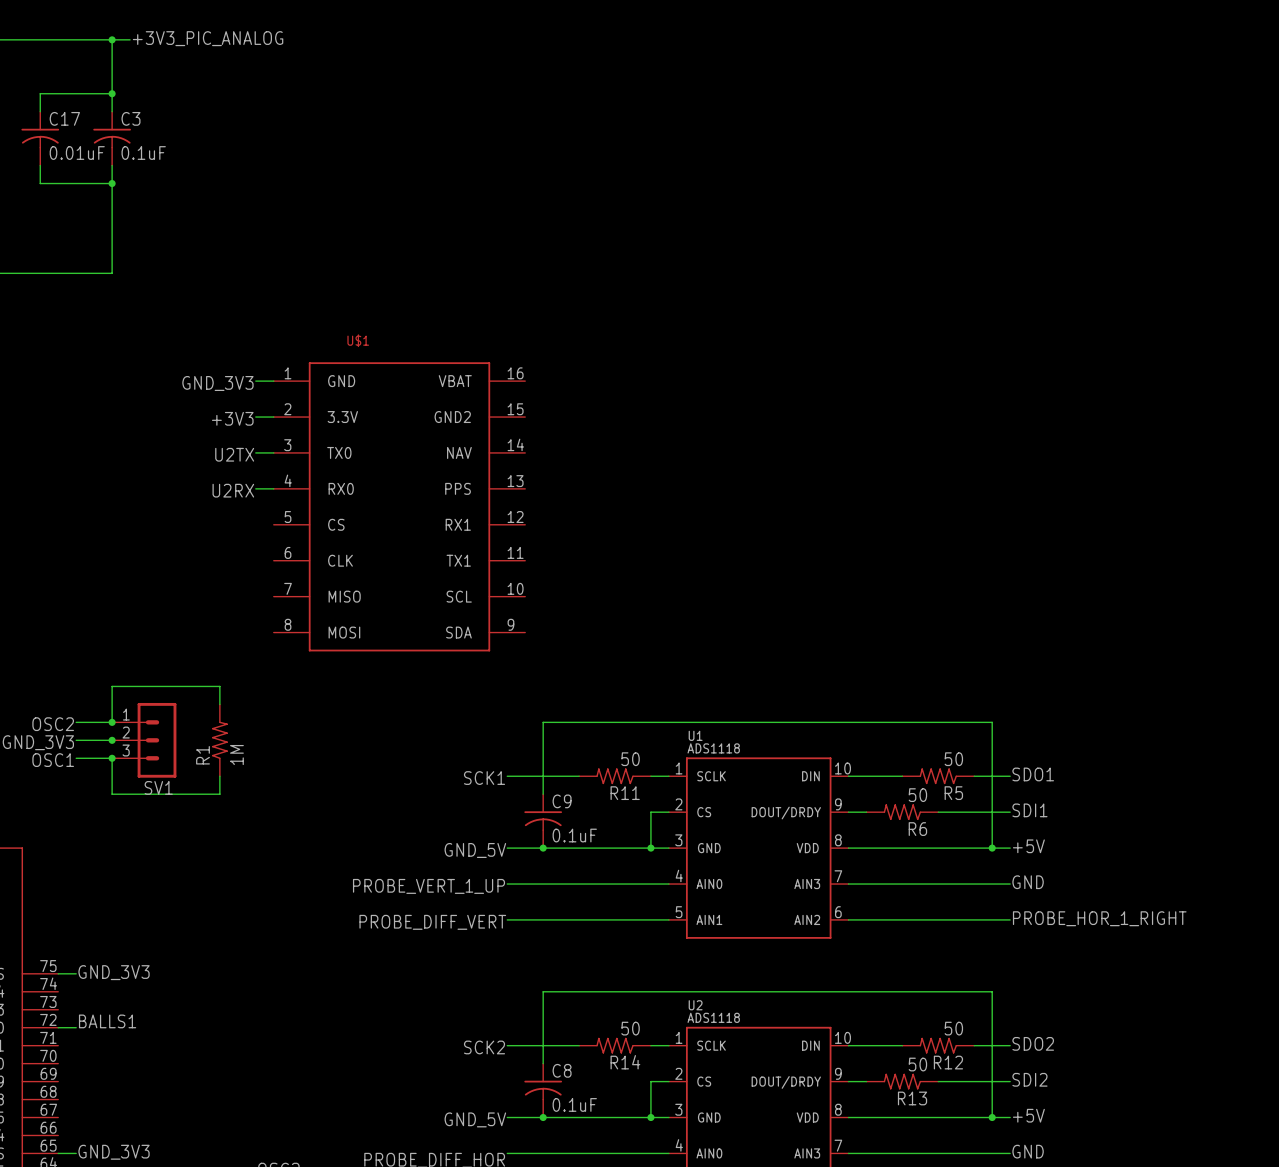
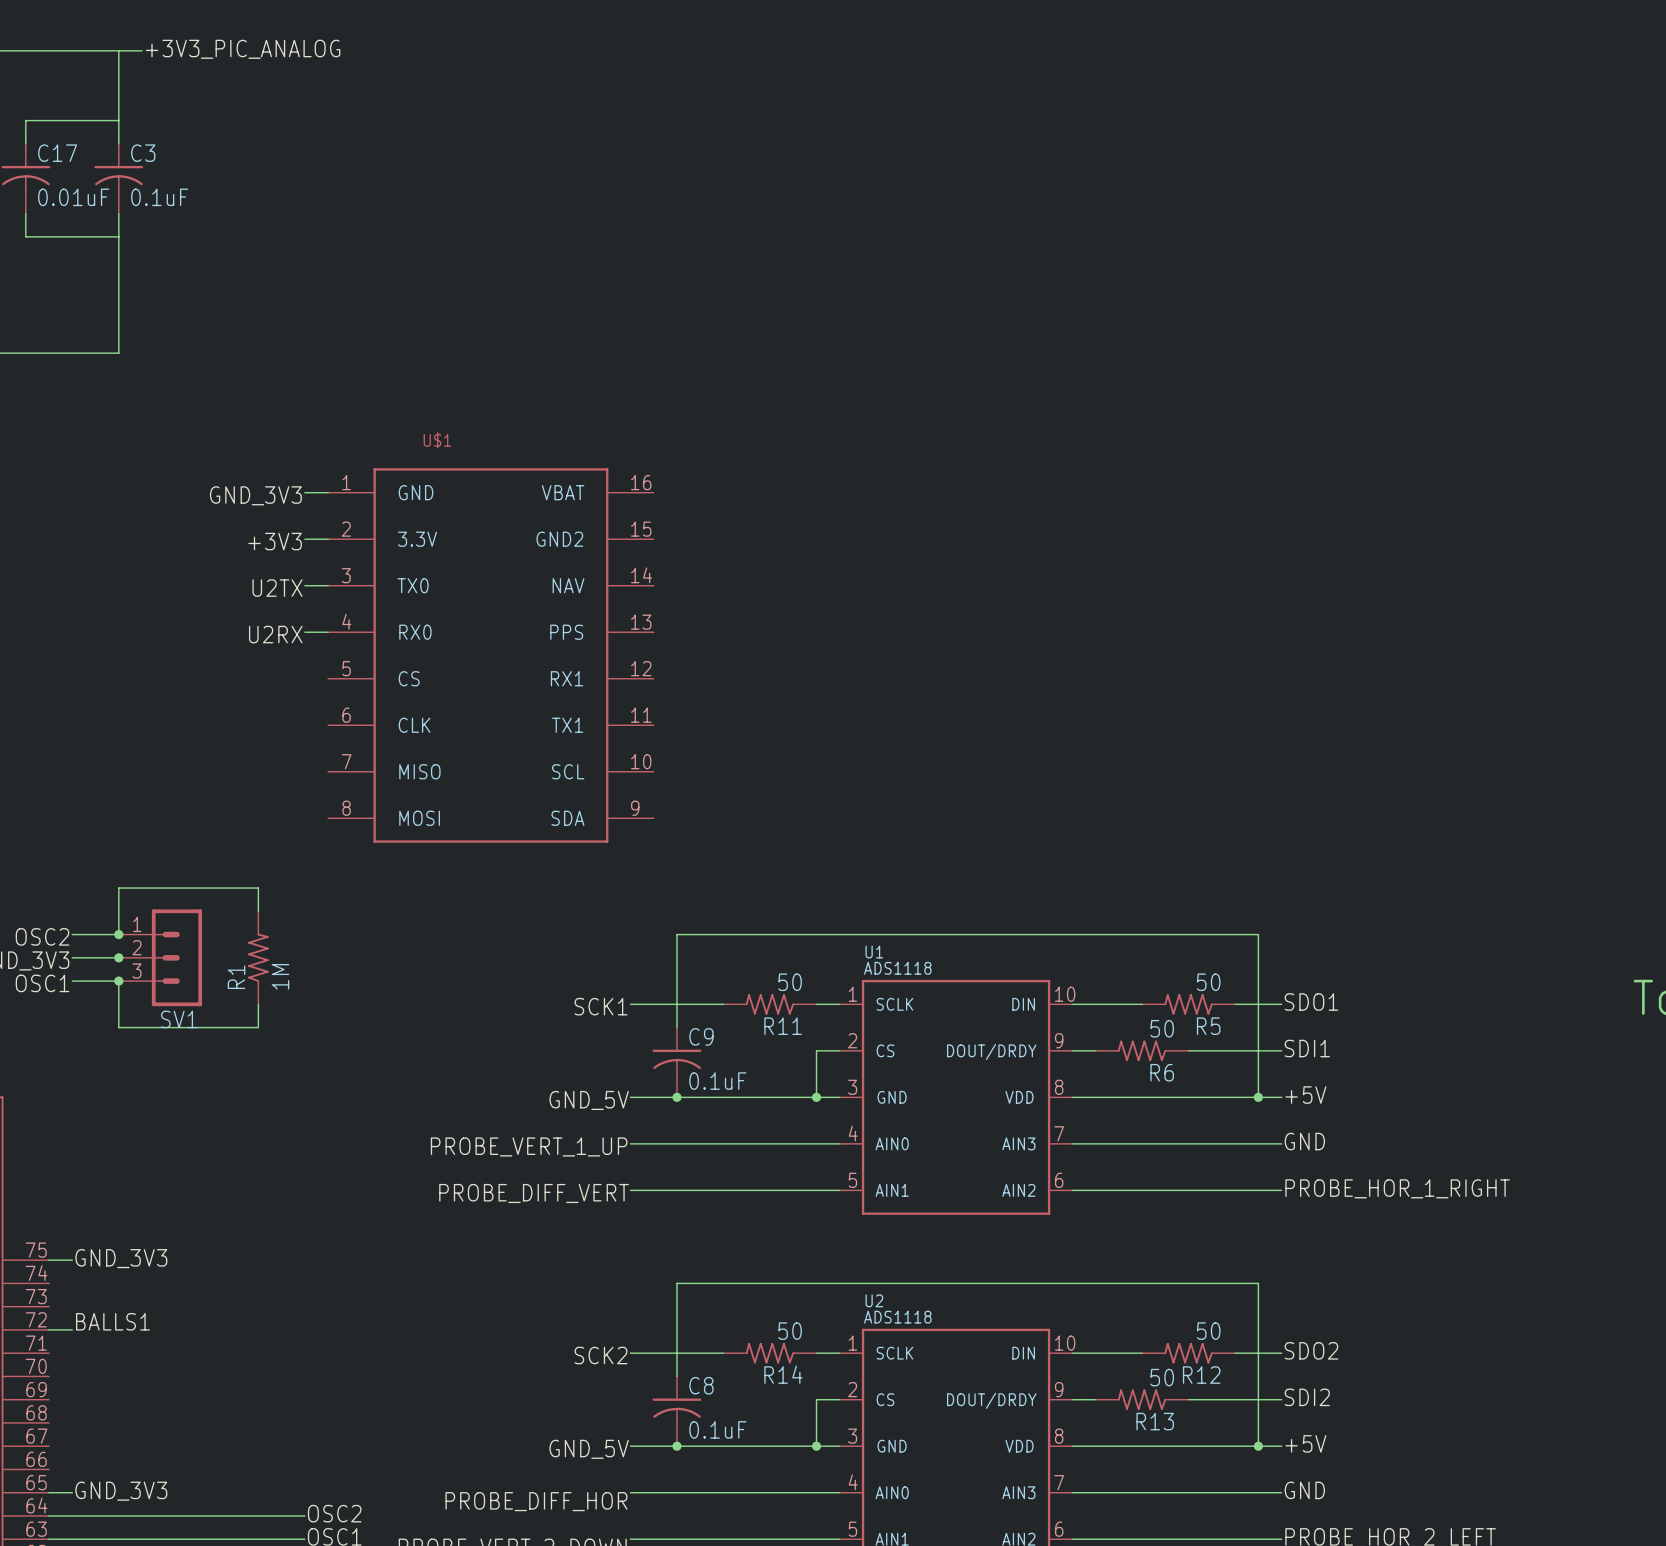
junction: (112, 39) -> none
junction: (112, 93) -> none
junction: (112, 183) -> none

